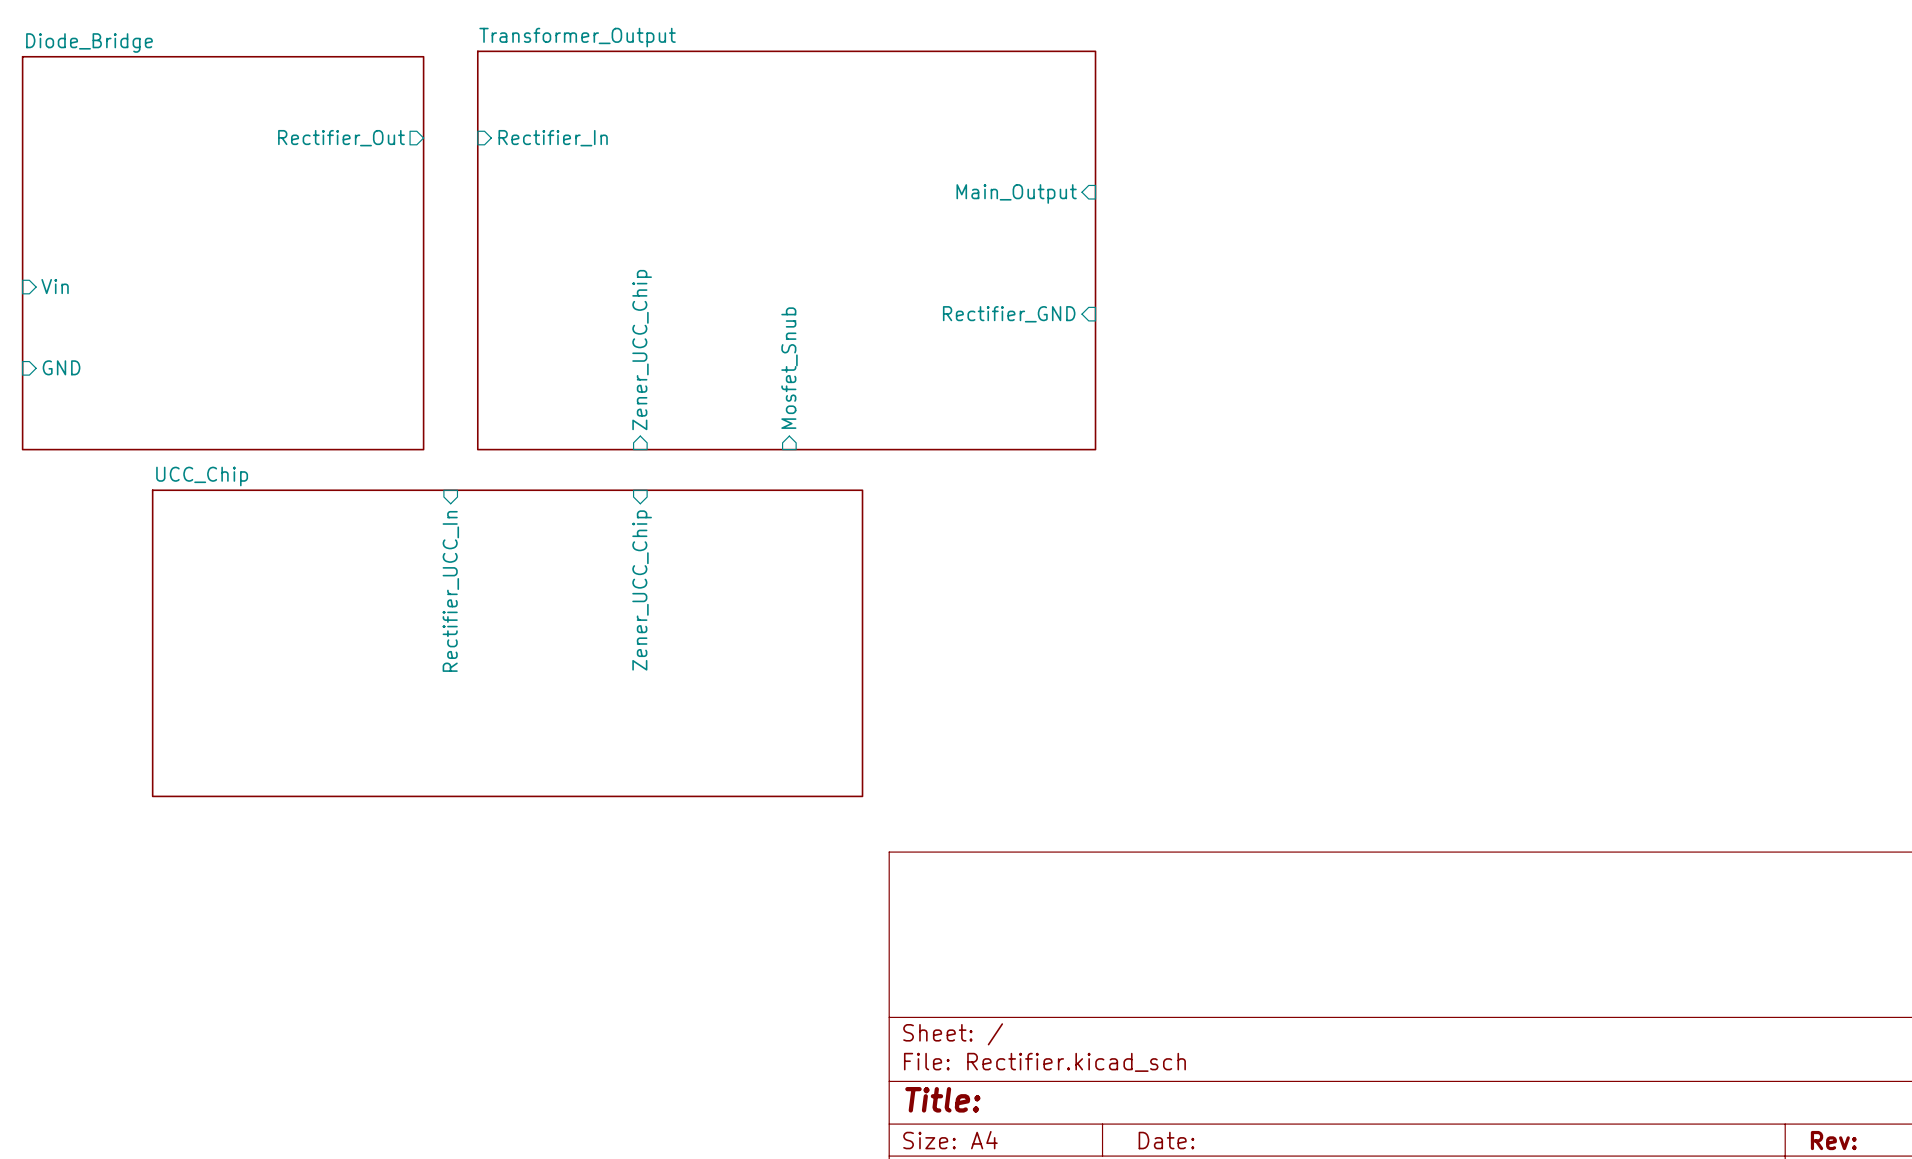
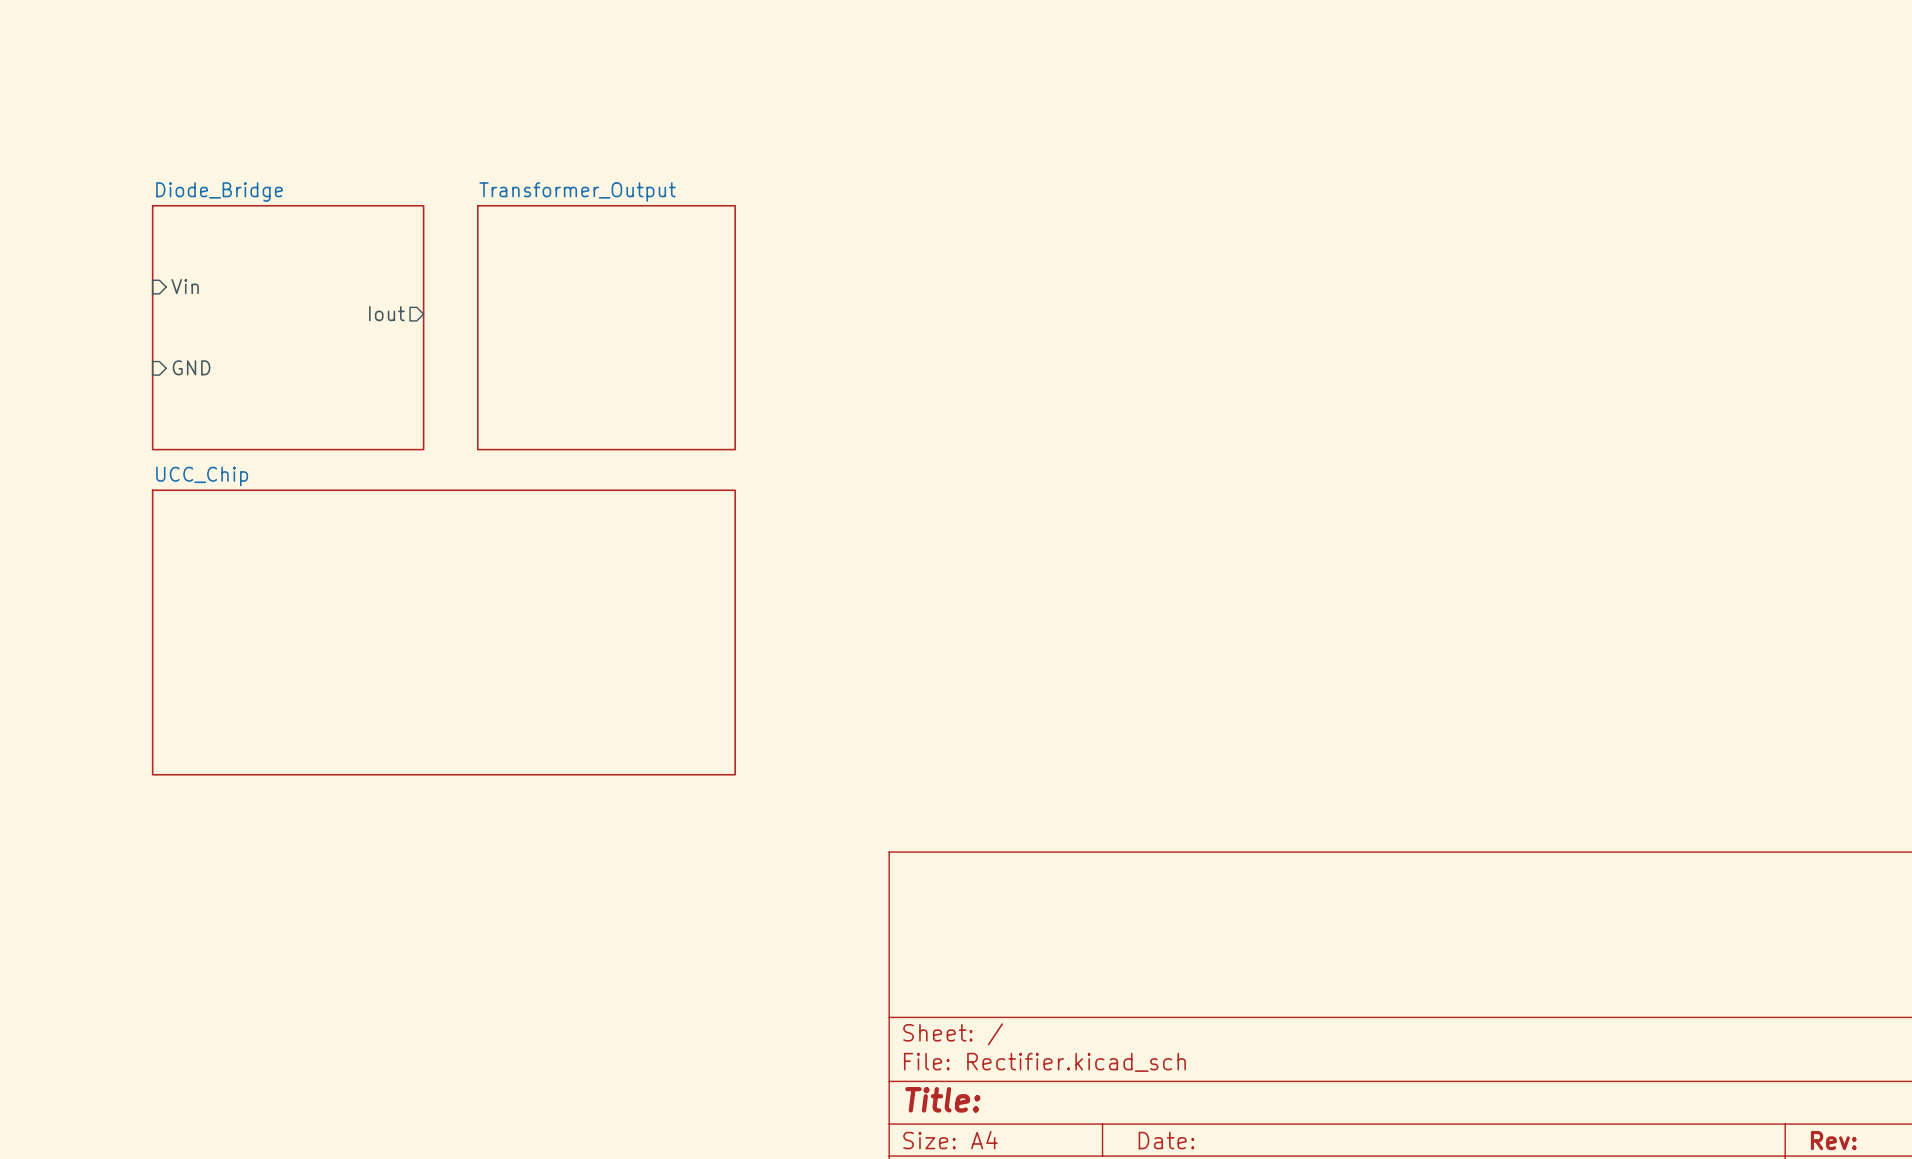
sheet pin: Rectifier_Out (341, 138) -> none
sheet pin: Rectifier_In (553, 138) -> none
sheet pin: Main_Output (1016, 193) -> none
sheet Transformer_Output: (786, 250) -> none
sheet Diode_Bridge: (223, 253) -> none
sheet pin position: Vin (55, 286) -> Vin (185, 286)
sheet pin: none -> Iout (386, 313)
sheet pin: Rectifier_GND (1009, 314) -> none
sheet Diode_Bridge: none -> (288, 327)
sheet Transformer_Output: none -> (606, 327)
sheet pin: Zener_UCC_Chip (642, 350) -> none
sheet pin position: GND (61, 367) -> GND (191, 367)
sheet pin: Mosfet_Snub (789, 368) -> none
sheet pin: Zener_UCC_Chip (642, 590) -> none
sheet pin: Rectifier_UCC_In (450, 591) -> none
sheet UCC_Chip: none -> (443, 632)
sheet UCC_Chip: (507, 643) -> none

